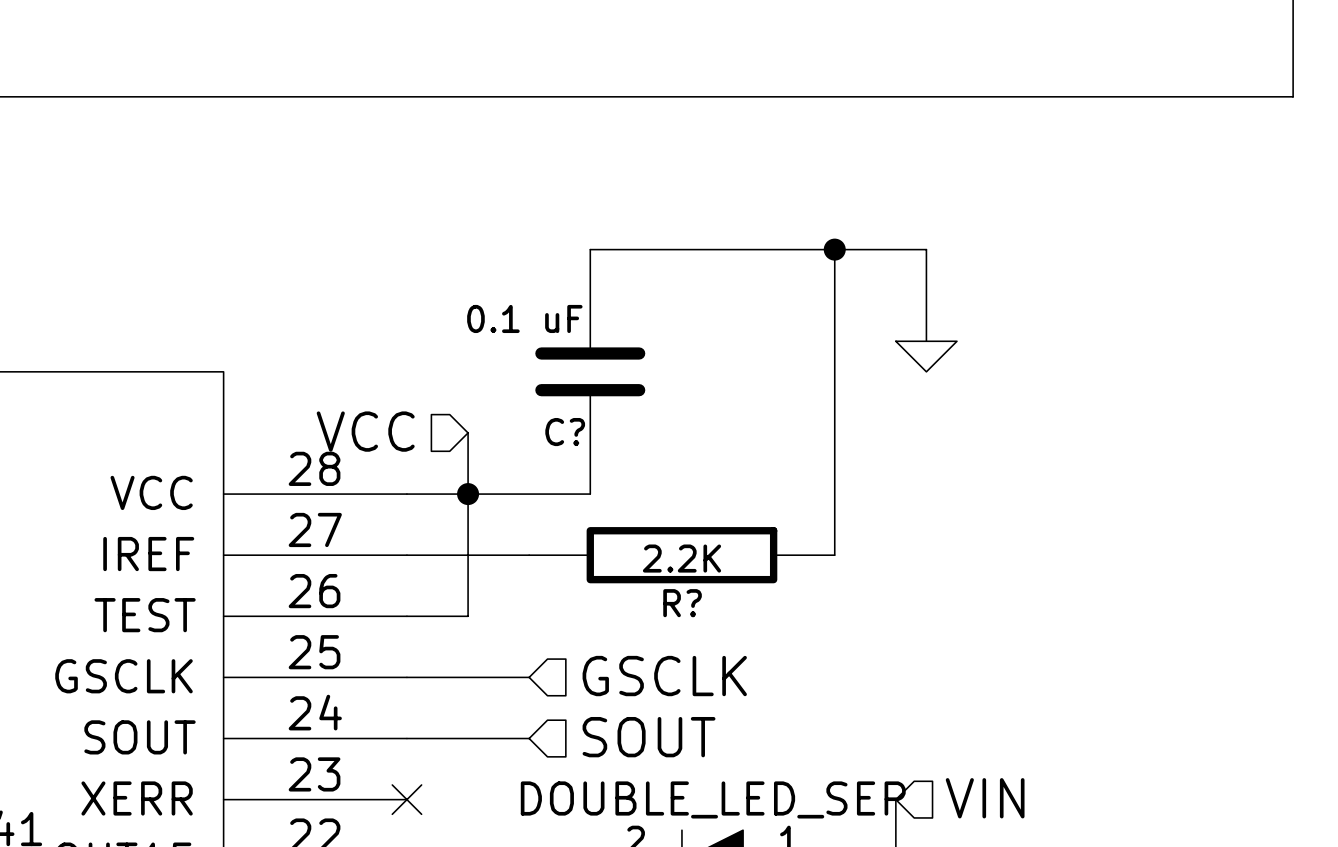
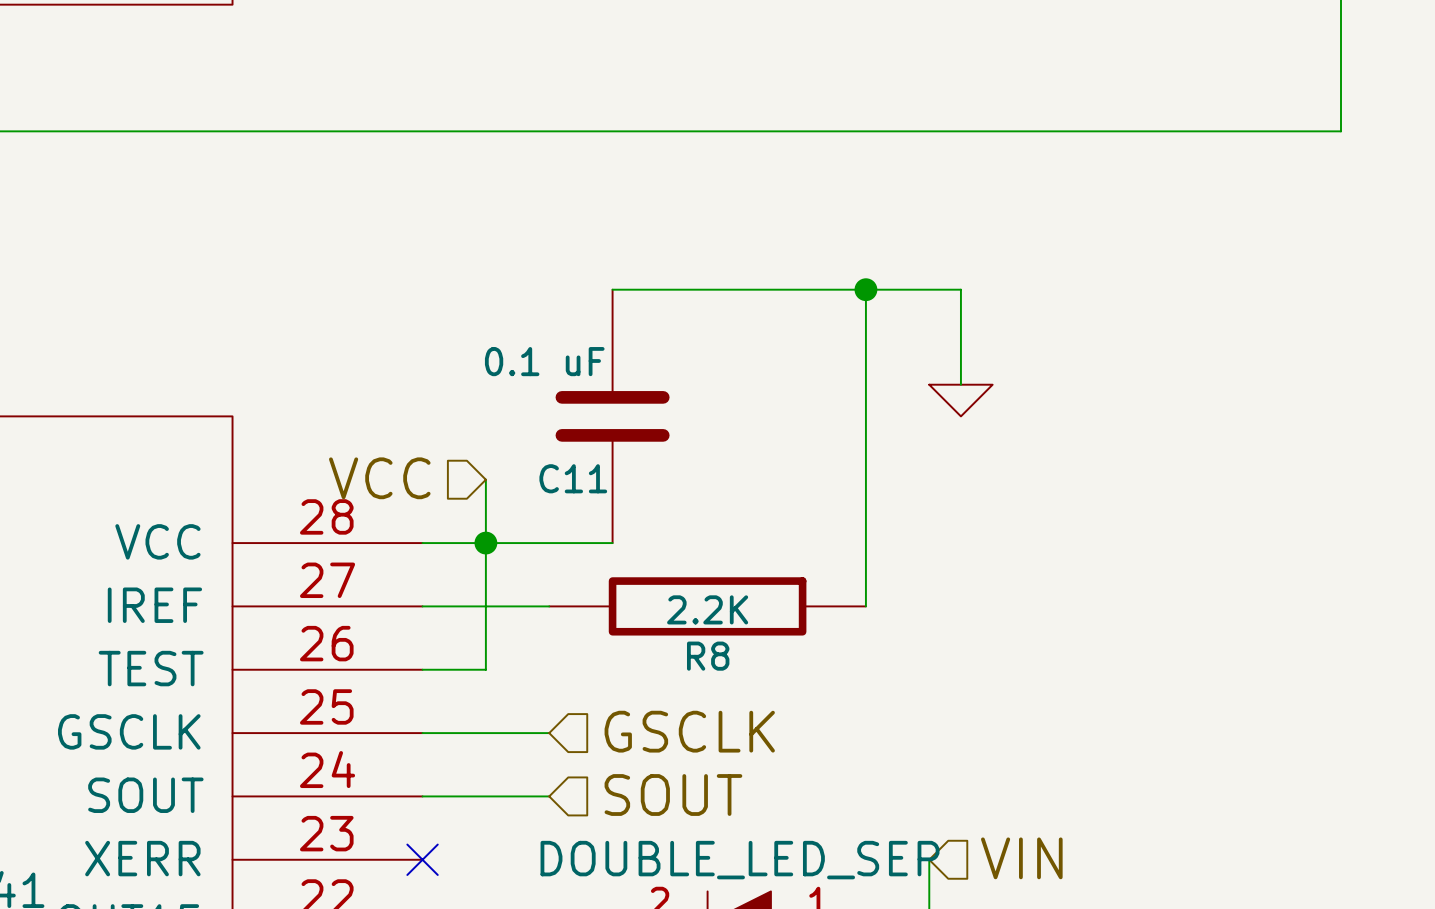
C? name: C? (565, 432) -> C11 (573, 478)
R? name: R? (682, 603) -> R8 (708, 656)

